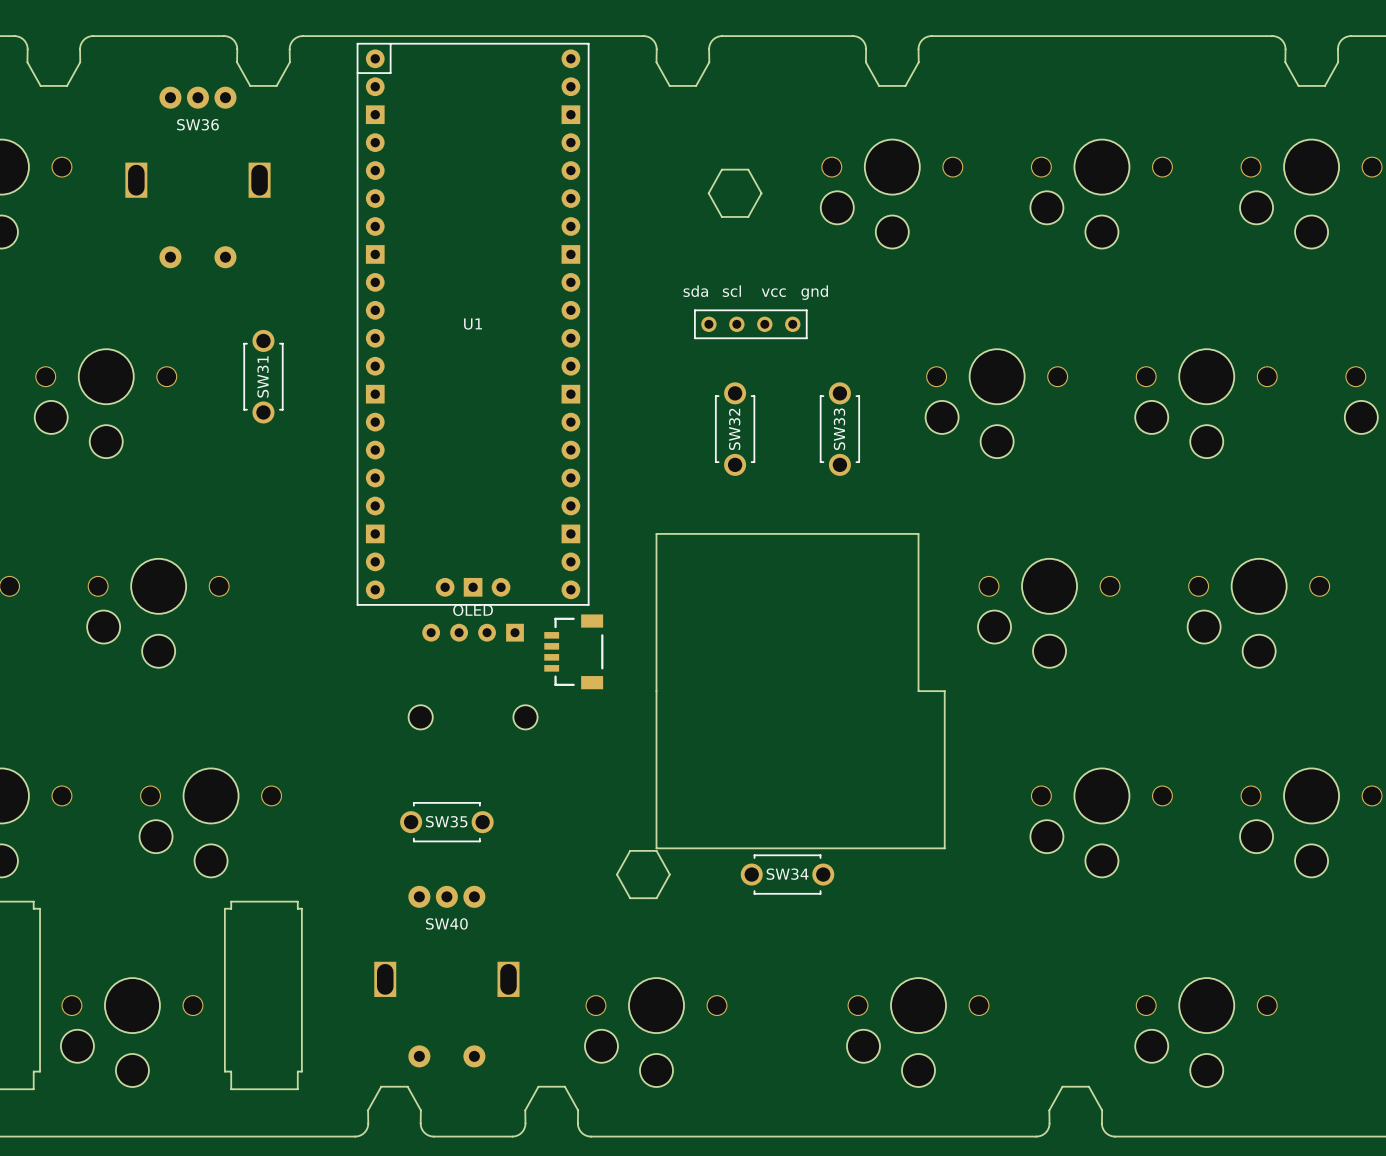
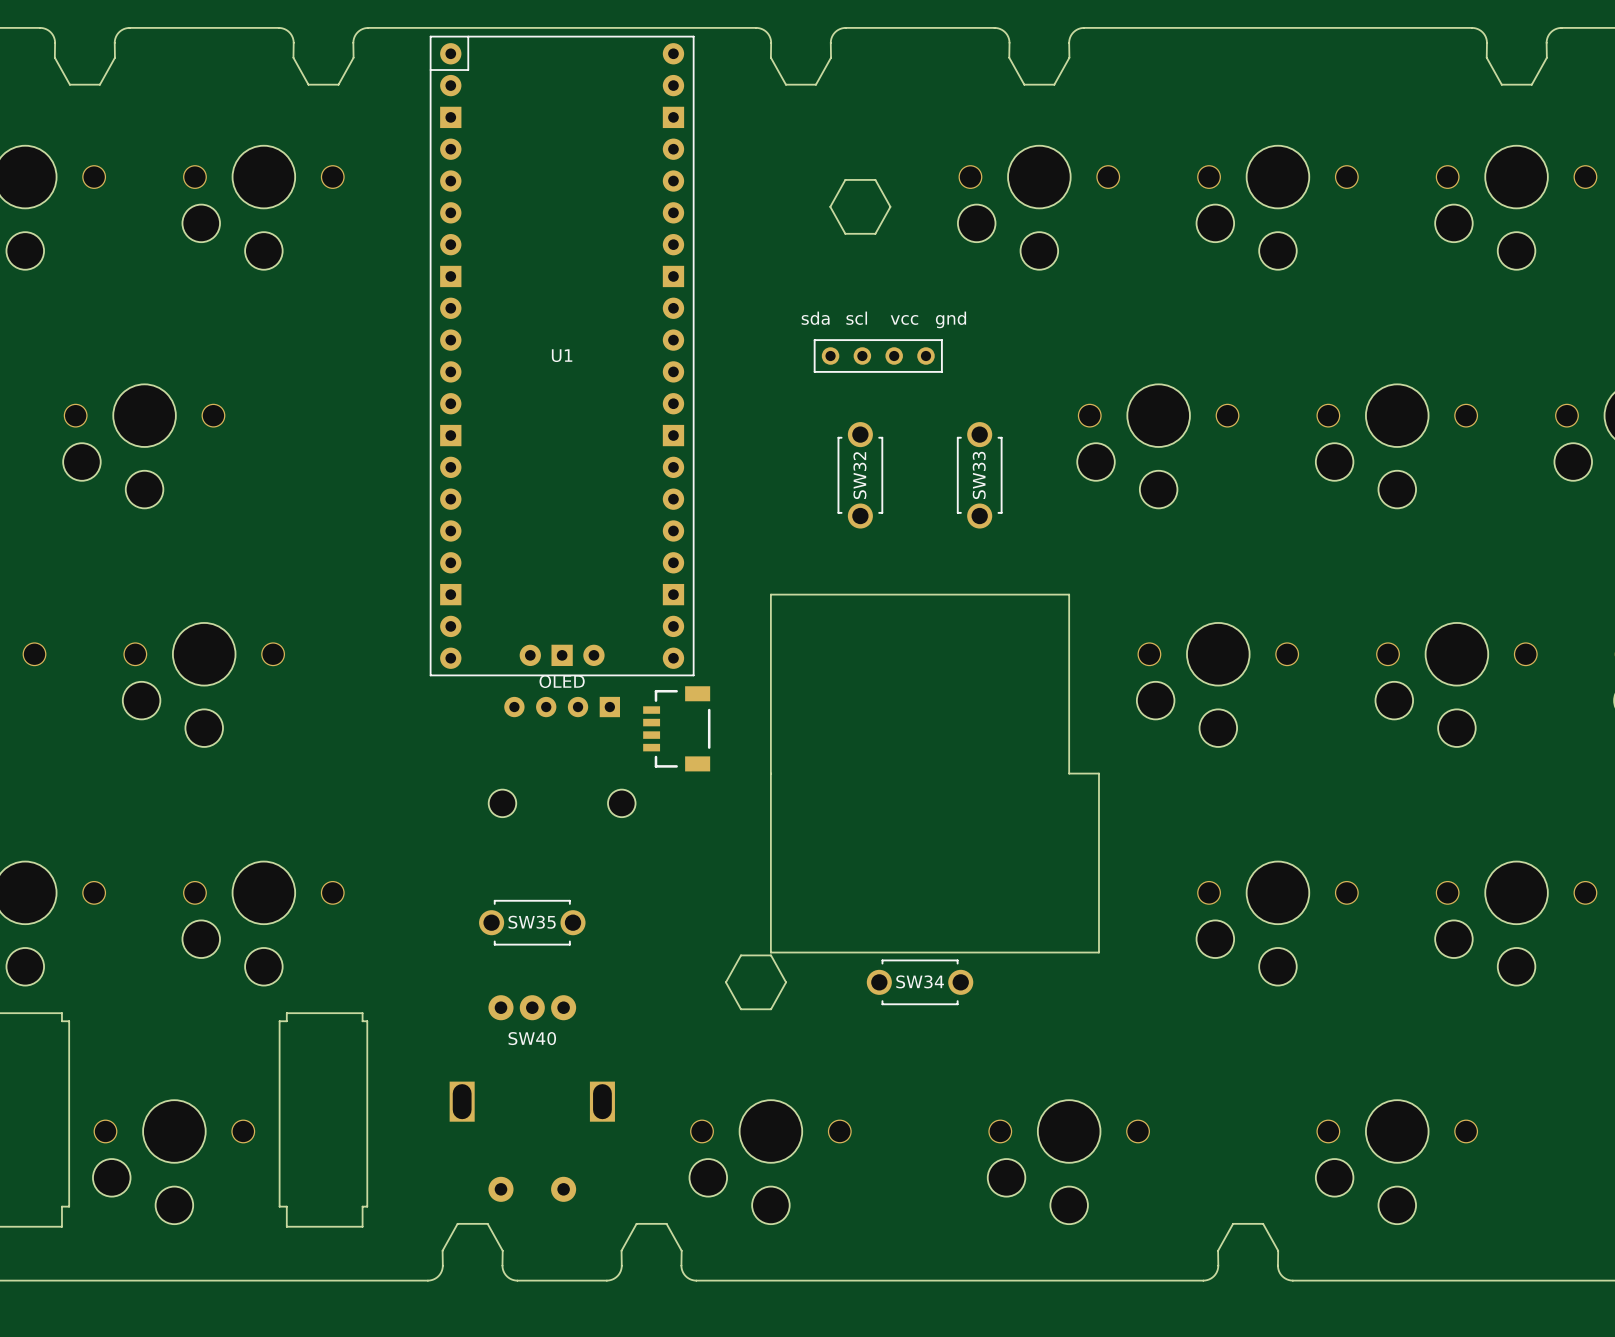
SW36: (197, 177) -> none
part: none -> (263, 207)
SW31: (263, 376) -> none

